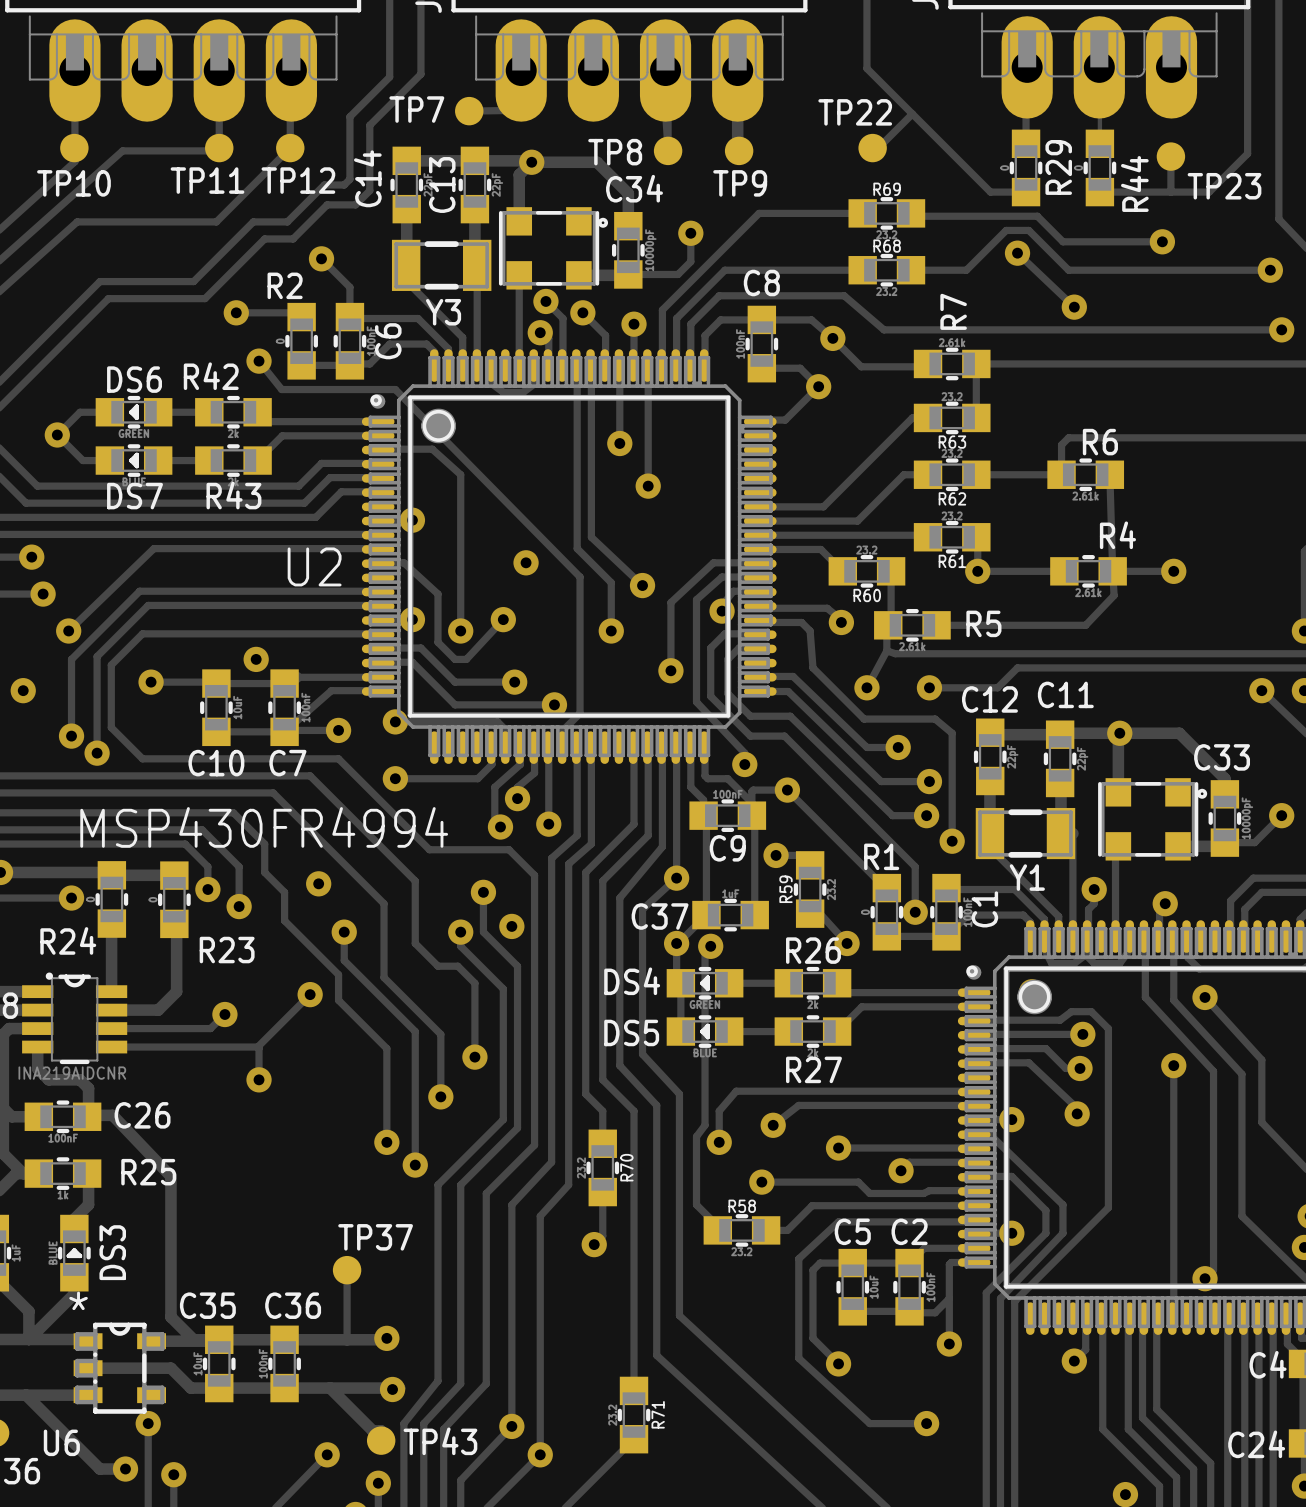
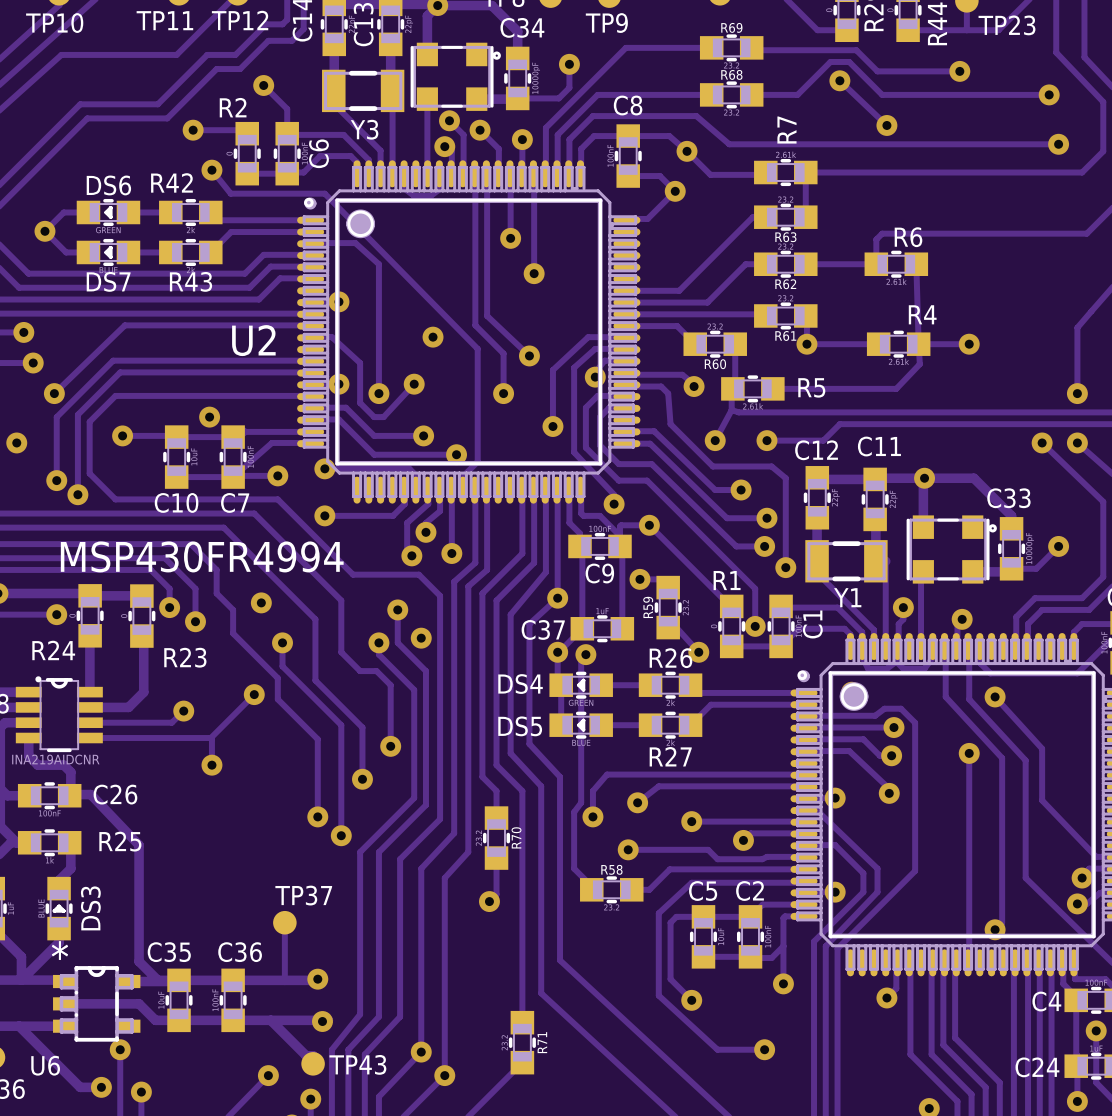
U6 footprint: [73, 1322, 167, 1414] -> [53, 966, 141, 1042]

